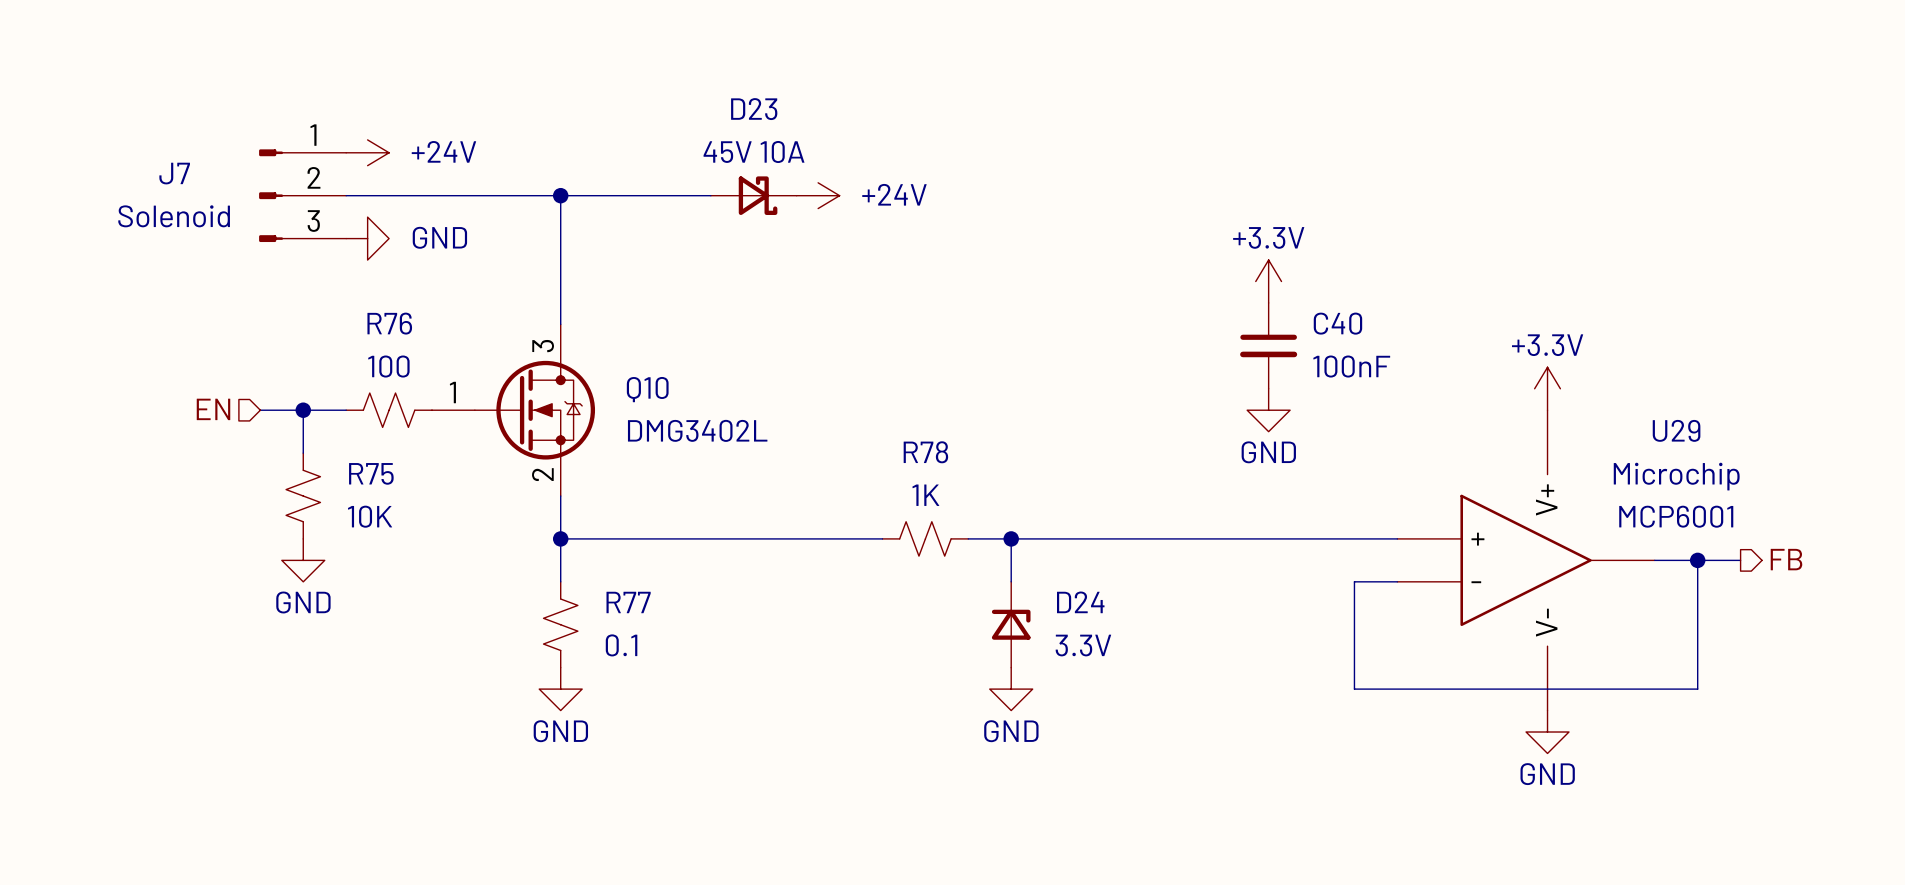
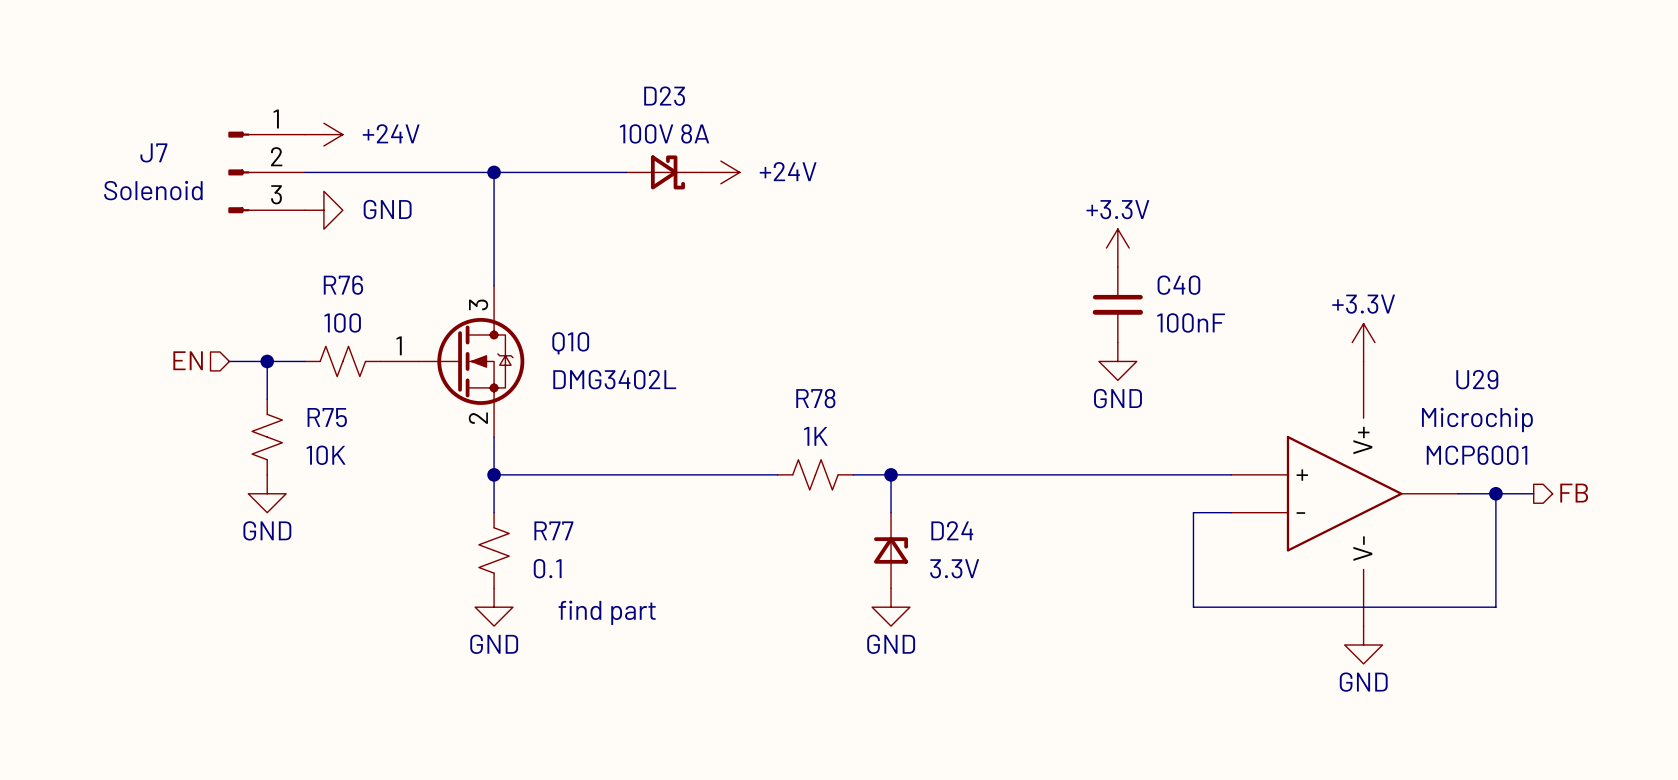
D23 value: 45V 10A (753, 151) -> 100V 8A (664, 133)
text: none -> find part (607, 612)

